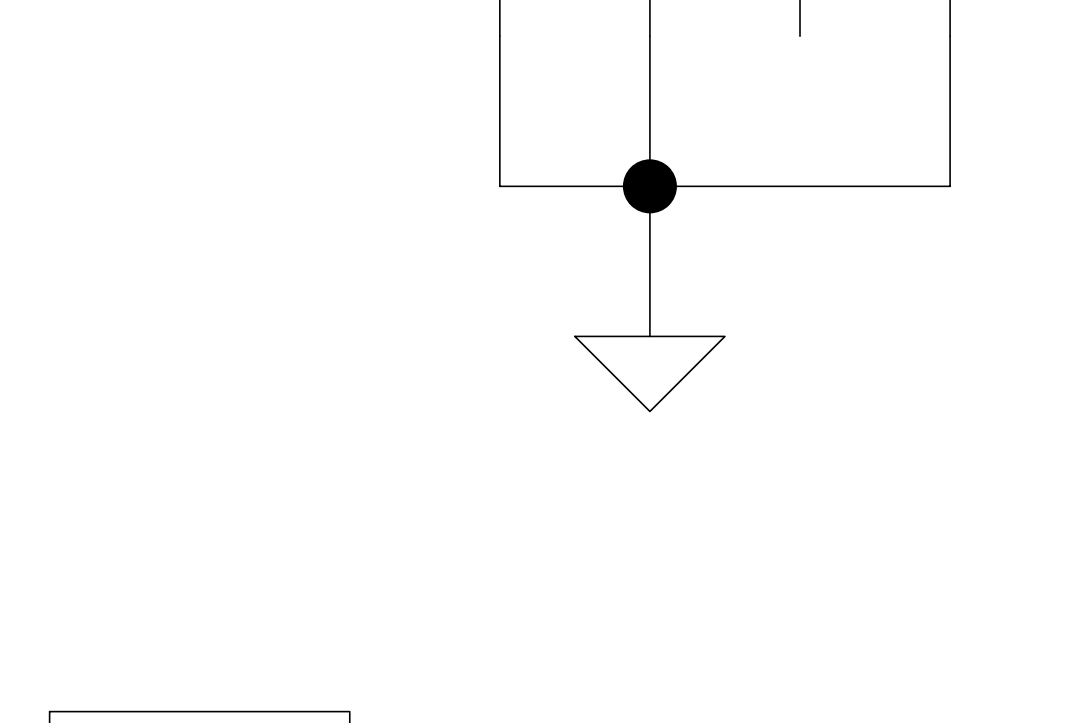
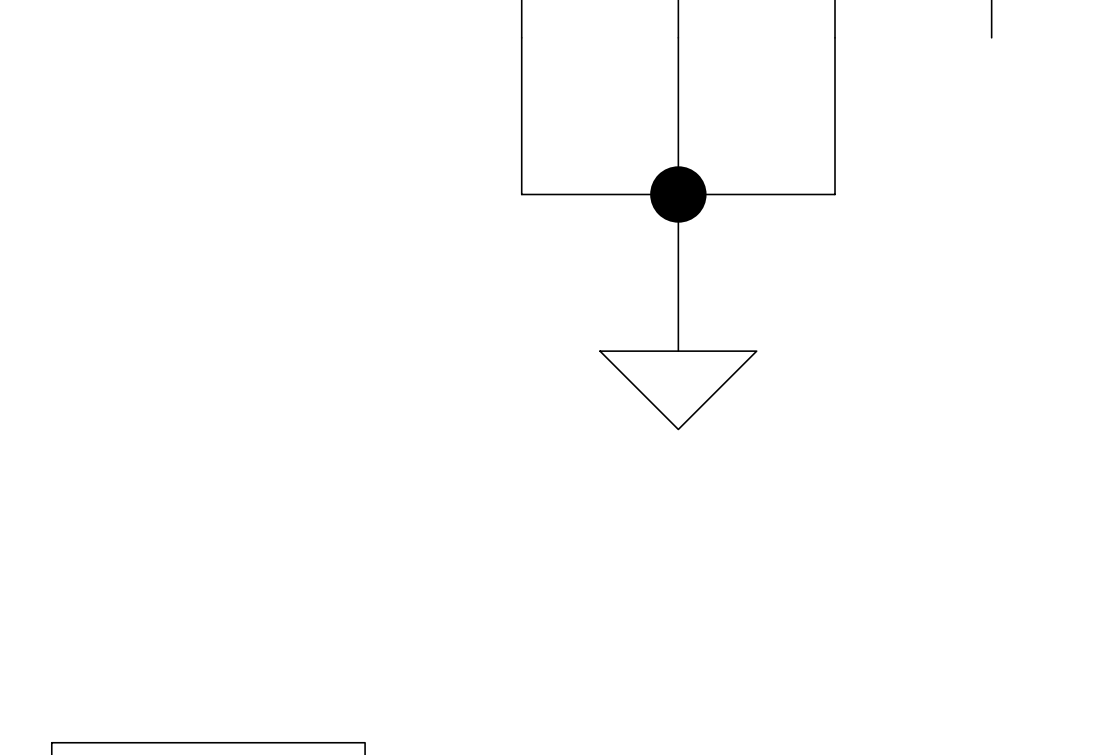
wire: (950, 36) (950, 186) (800, 186) -> (835, 37) (835, 194)

